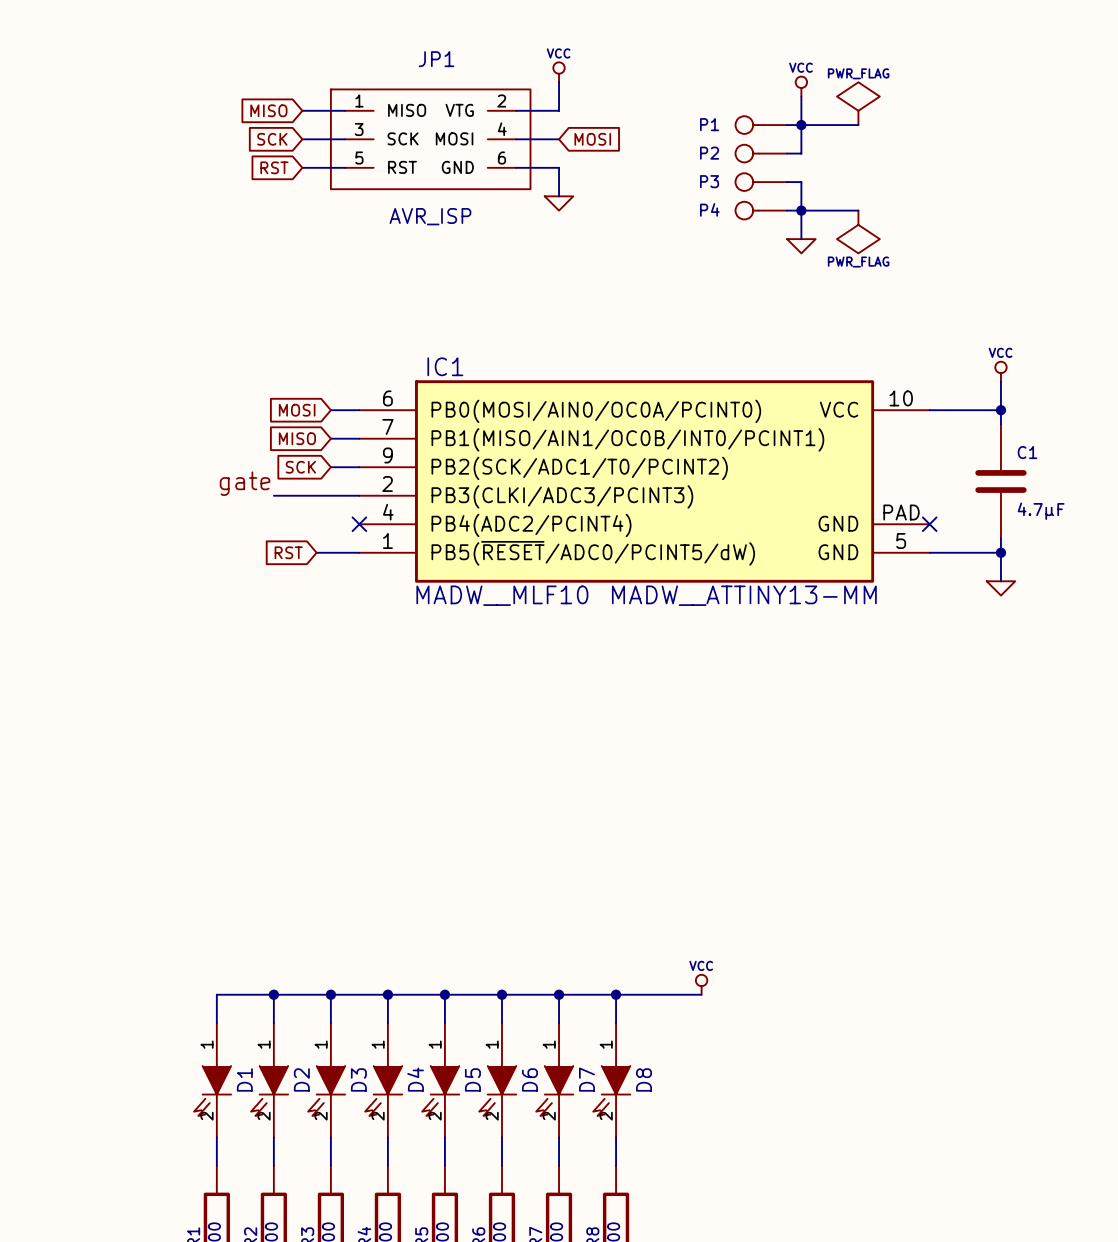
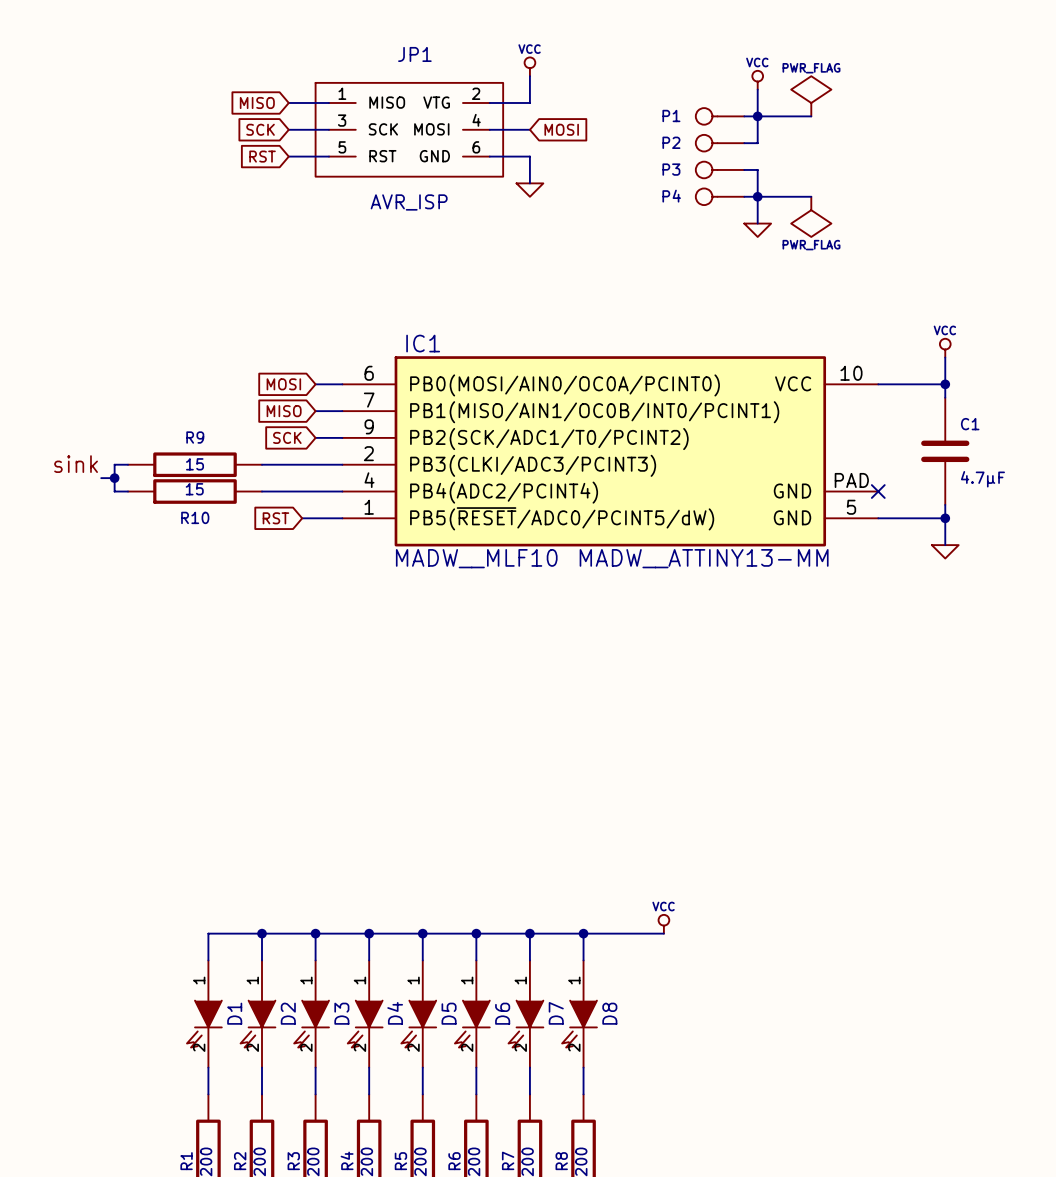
label: gate (245, 483) -> none
label: none -> sink (76, 464)
wire: none -> (128, 464) (114, 464) (114, 491) (128, 491)
R9: none -> 15 (195, 464)
wire: none -> (101, 478) (114, 478)
junction: none -> (114, 478)
R10: none -> 15 (195, 491)
wire: none -> (262, 491) (342, 491)
no-connect mark: (359, 524) -> none

